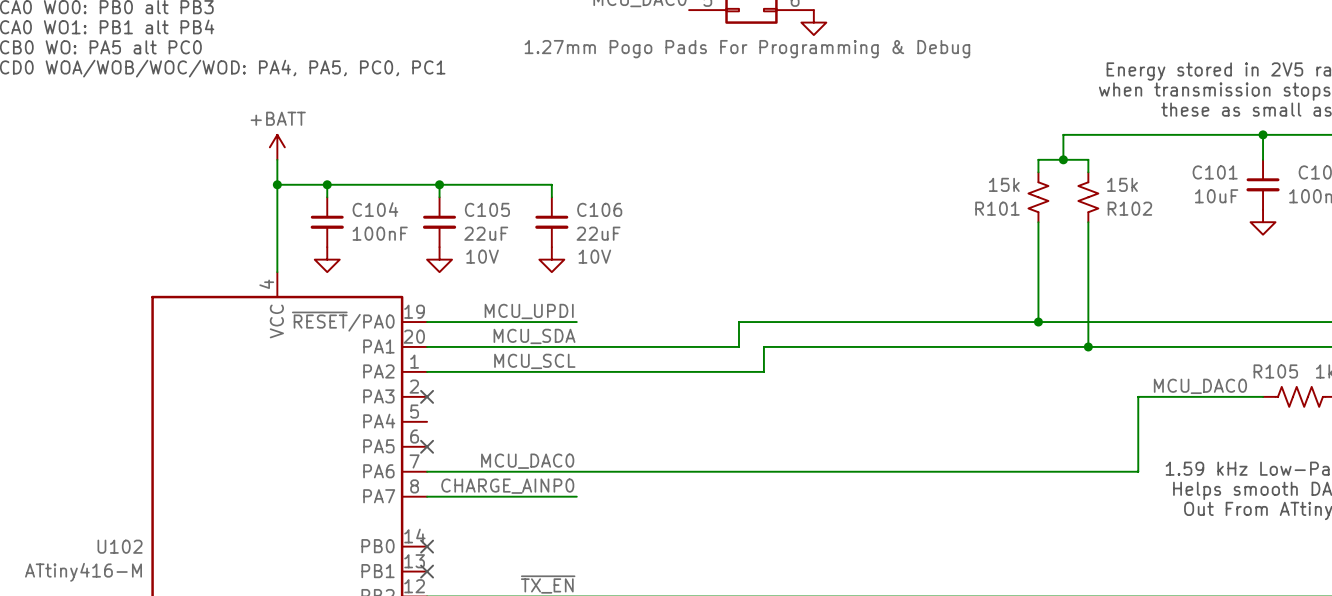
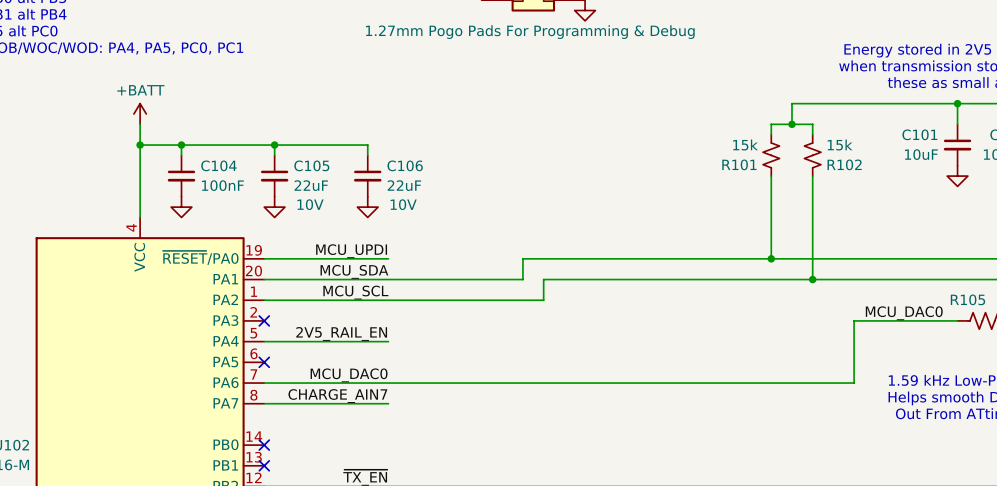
label: none -> 2V5_RAIL_EN (341, 333)
wire: none -> (264, 341) (388, 341)
label: CHARGE_AINP0 (507, 486) -> CHARGE_AIN7 (337, 396)

